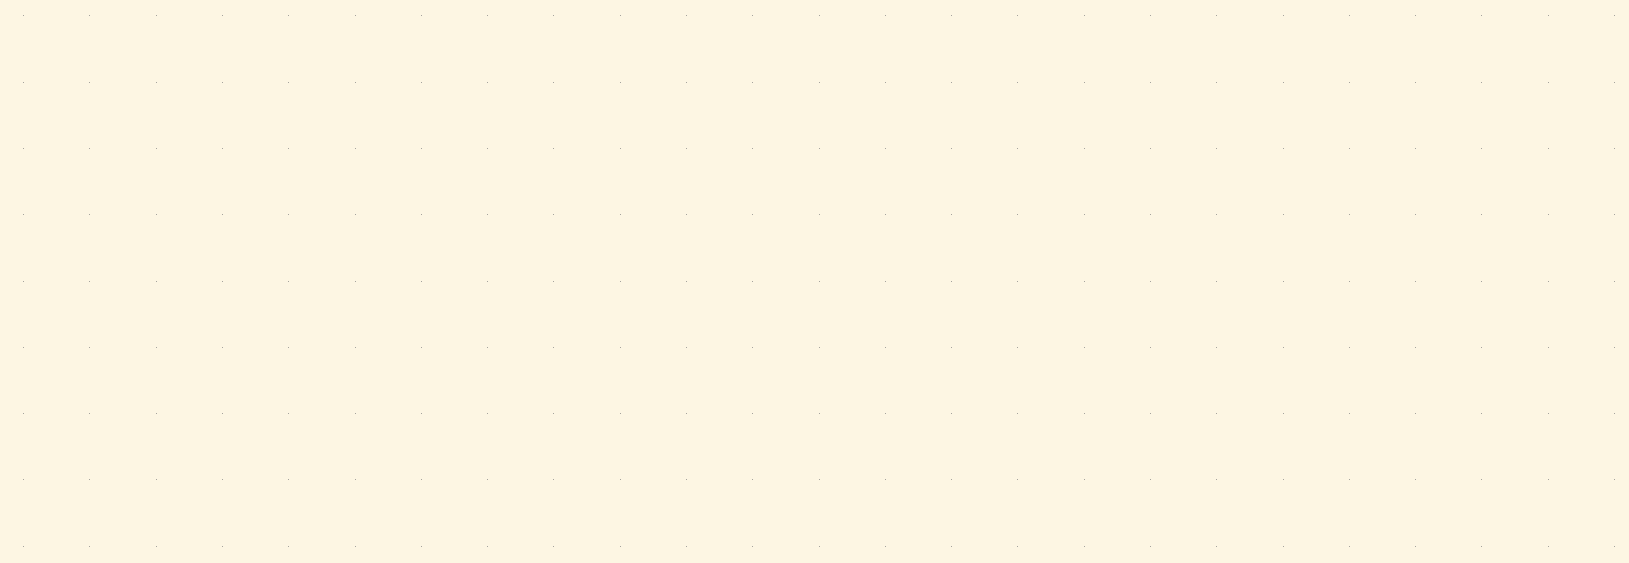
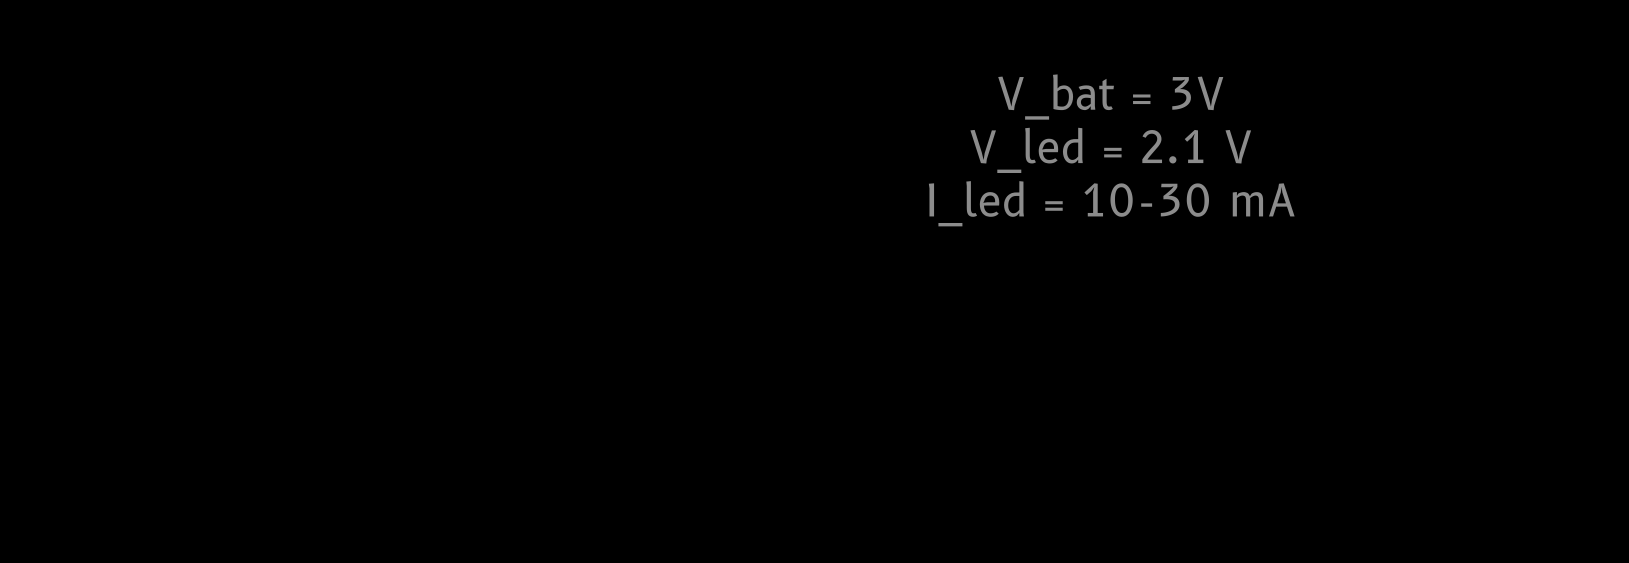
text: none -> V_bat = 3V (1110, 97)
text: none -> V_led = 2.1 V (1110, 150)
text: none -> I_led = 10-30 mA (1111, 203)

